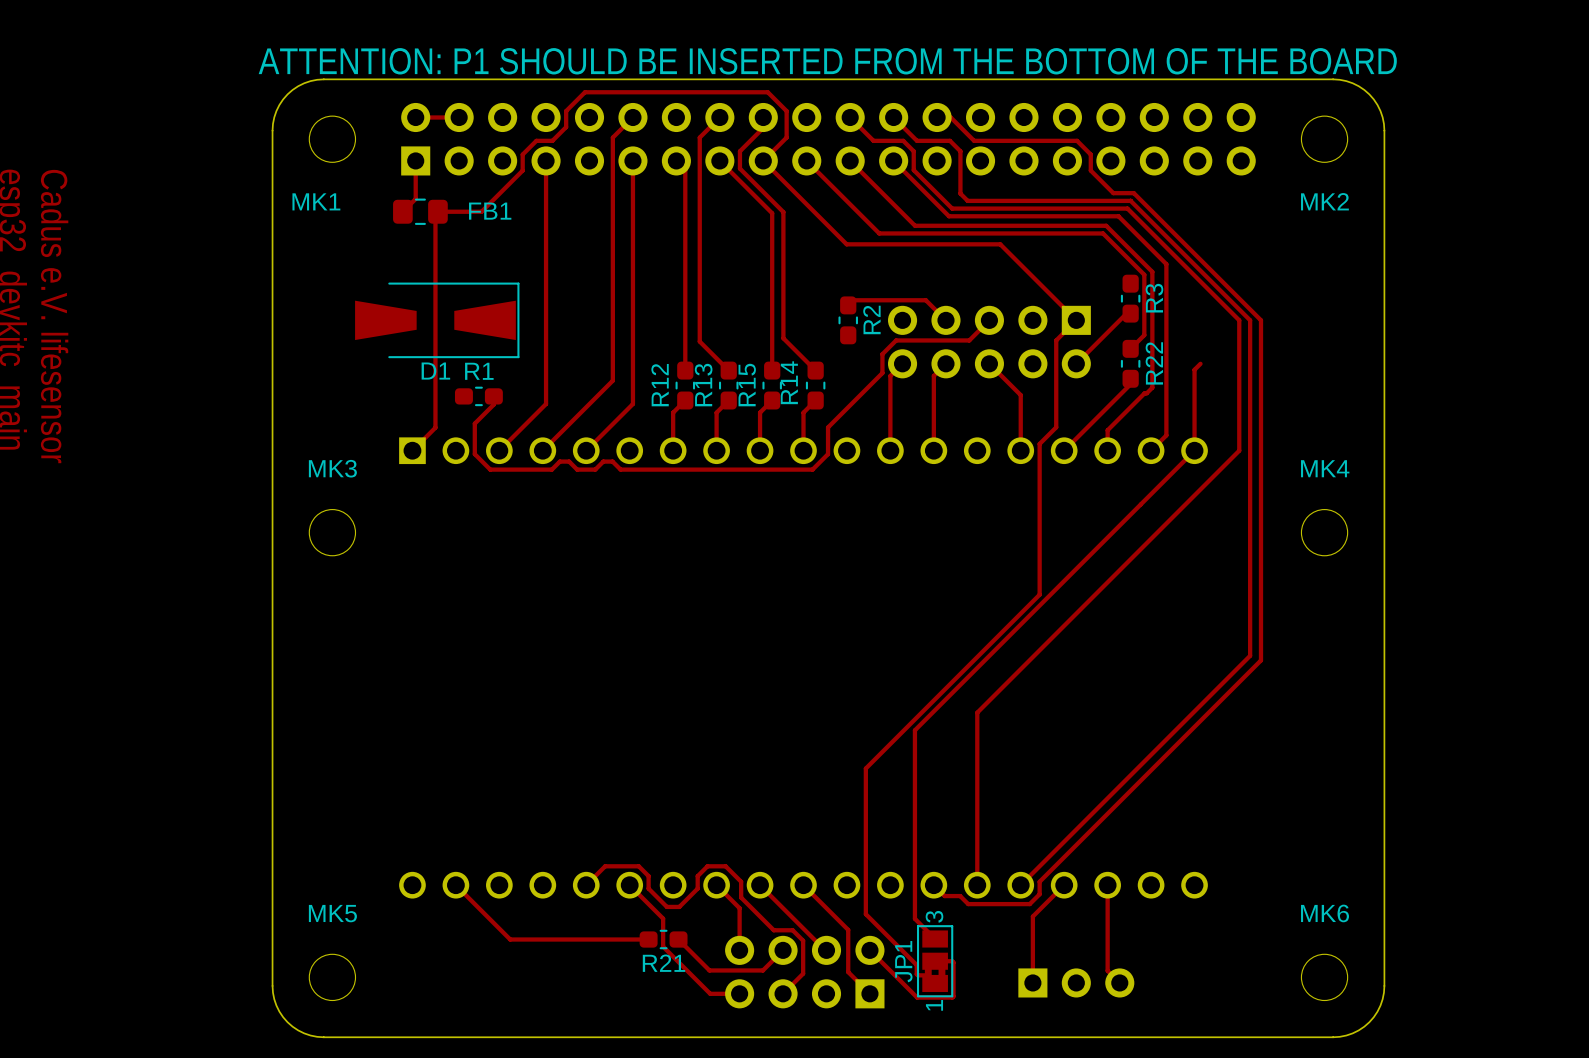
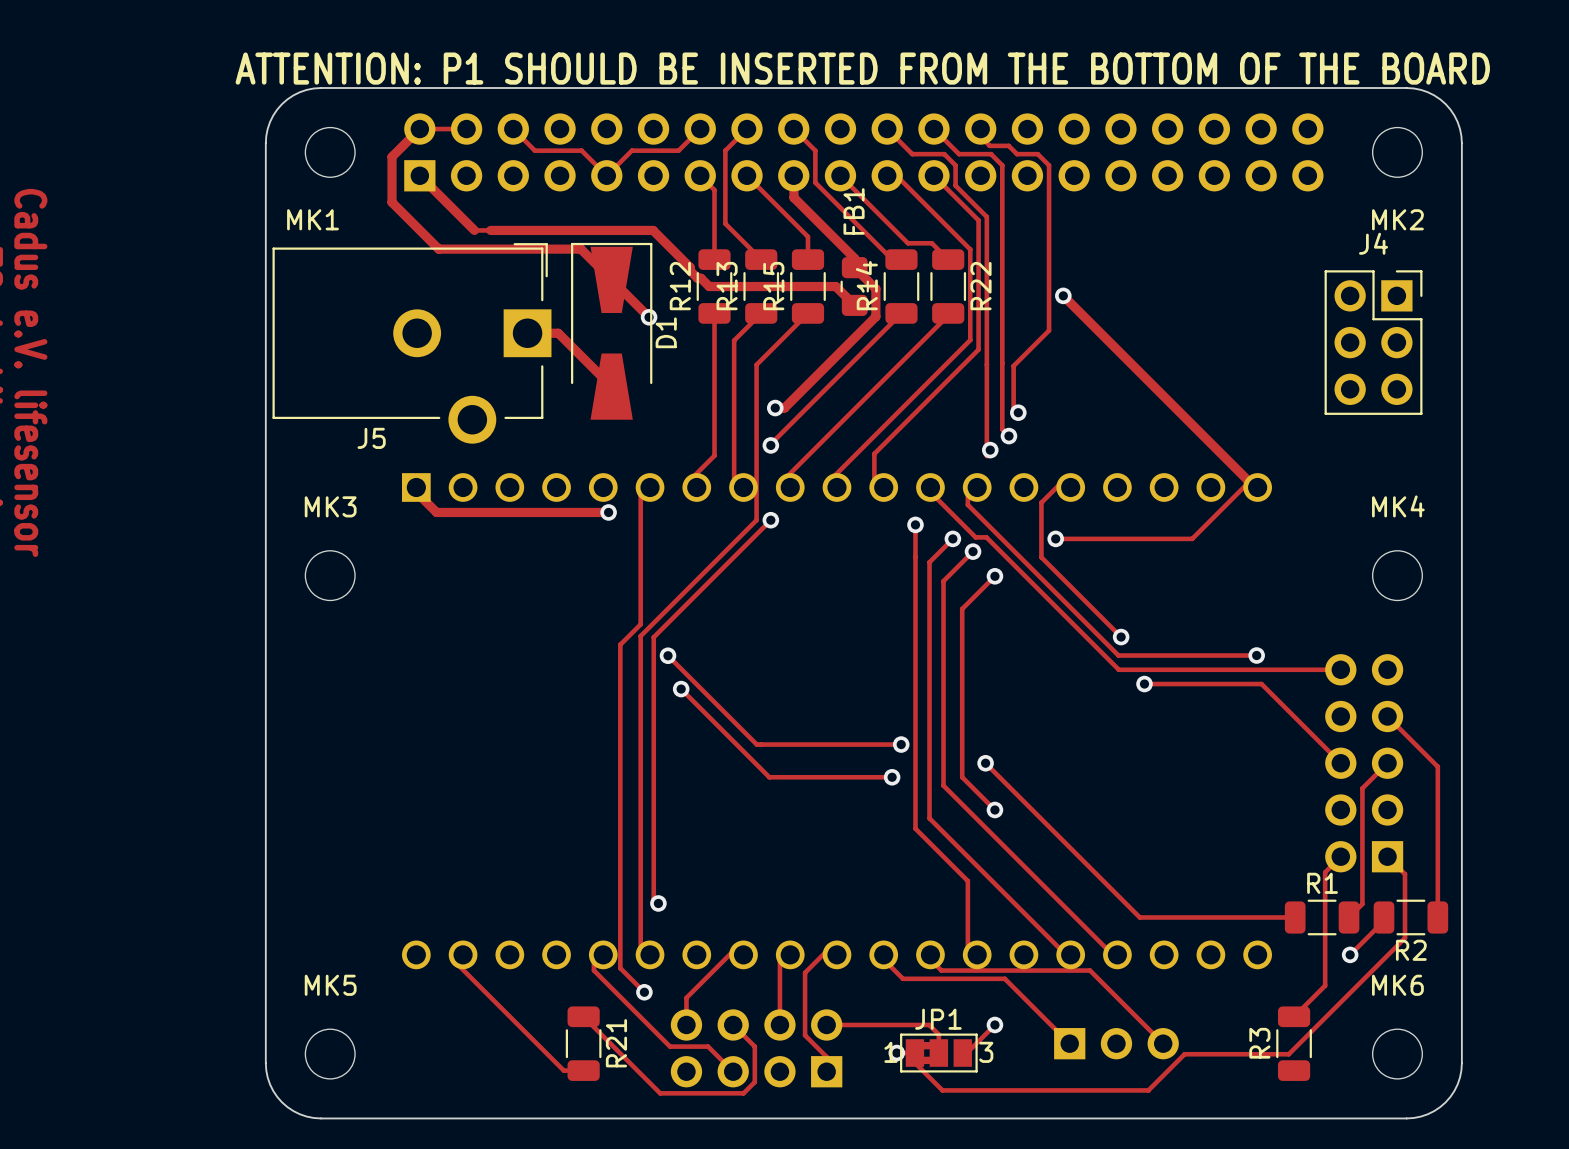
track: none -> (419, 129) (392, 156) (392, 202) (438, 249) (580, 249) (649, 317)
track: none -> (513, 129) (534, 150) (581, 150) (606, 175) (631, 150) (678, 150) (700, 129)
track: (632, 117) (612, 137) (612, 380) (542, 450) -> none
track: (763, 117) (763, 127) (739, 151) (739, 168) (783, 212) (783, 338) (815, 370) -> (793, 129) (815, 150) (815, 182) (892, 259) (901, 259)
track: (937, 117) (950, 117) (974, 140) -> (980, 129) (980, 136) (989, 145) (1008, 145) (1017, 154) (1020, 154)
track: (946, 140) (949, 140) (960, 151) (960, 193) (967, 200) (1130, 200) -> (991, 154) (1002, 165) (1002, 429) (1008, 436)
track: (990, 140) (1077, 140) (1090, 154) (1090, 170) (1113, 193) (1133, 193) (1260, 320) (1260, 660) (1039, 881) (1039, 894) (1029, 904) (968, 904) (960, 896) (944, 896) (933, 885) -> (1037, 154) (1049, 165) (1049, 330) (1013, 365) (1013, 408) (1018, 412)
track: (415, 160) (415, 198) (402, 211) -> (419, 175) (474, 230)
track: (546, 160) (546, 404) (499, 450) -> none
track: (632, 160) (632, 404) (586, 450) -> none
track: (850, 160) (915, 225) (1106, 225) (1152, 271) (1152, 387) (1107, 430) (1107, 450) -> (887, 175) (896, 175) (970, 249) (970, 340) (827, 482)
track: none -> (793, 176) (793, 197) (854, 258) (854, 267) (875, 288) (875, 316) (784, 408) (775, 408)
track: (685, 169) (685, 370) -> (709, 185) (714, 190) (714, 259)
track: (942, 199) (952, 208) (1127, 208) (1239, 320) (1239, 450) (977, 712) (977, 885) -> (986, 216) (986, 456) (990, 450)
track: (1130, 200) (1250, 320) (1250, 655) (1020, 885) -> none
track: (935, 202) (948, 216) (1118, 216) (1166, 264) (1166, 435) (1151, 450) -> (978, 220) (978, 349) (874, 453) (874, 482)
track: (699, 205) (699, 341) (728, 370) -> (725, 223) (761, 259)
FB1 rotation: 0° (420, 211) -> 90° clockwise (854, 286)
FB1 position: (420, 211) -> (854, 286)
track: (466, 211) (437, 211) (435, 214) (435, 427) (412, 450) -> none
track: (481, 211) (522, 170) (522, 154) (536, 140) (552, 140) (566, 127) (566, 111) (584, 92) (767, 92) (786, 111) (786, 137) (763, 160) (846, 244) (1000, 244) (1076, 320) (1056, 340) (1056, 427) (1039, 443) (1039, 594) (865, 768) (865, 914) (916, 965) (917, 975) (927, 975) (935, 983) -> (490, 230) (653, 230) (690, 267) (690, 270) (709, 286) (835, 286) (854, 305)
FB1 name position: FB1 (490, 211) -> FB1 (854, 211)
track: (772, 213) (772, 370) -> (803, 232) (807, 236) (807, 259)
track: (869, 223) (879, 233) (1103, 233) (1144, 274) (1144, 335) (1130, 348) -> (907, 243) (931, 243) (948, 259)
track: none -> (1063, 295) (1248, 482) (1192, 538) (1055, 538)
via: none -> (1063, 295)
R3 footprint: [1120, 274, 1141, 323] -> [1276, 1006, 1312, 1081]
track: none -> (714, 313) (714, 455) (687, 482)
track: none -> (761, 313) (734, 340) (734, 482)
track: none -> (807, 313) (756, 364) (756, 520) (640, 636) (640, 950)
track: none -> (901, 313) (770, 445)
track: none -> (948, 313) (780, 482)
via: none -> (649, 317)
R2 footprint: [838, 296, 858, 345] -> [1373, 899, 1449, 936]
R3 name position: R3 (1154, 298) -> R3 (1259, 1043)
track: (848, 305) (853, 300) (925, 300) (945, 320) -> none
track: none -> (527, 333) (558, 333) (611, 386)
track: (1130, 313) (1126, 313) (1076, 363) -> none
J5: none -> (412, 343)
J4: none -> (1373, 342)
R2 name position: R2 (871, 319) -> R2 (1411, 950)
D1 rotation: 0° (437, 320) -> 90° counterclockwise (611, 331)
D1 position: (437, 320) -> (611, 331)
track: (989, 320) (969, 340) (896, 340) (882, 354) (882, 373) (828, 427) (828, 454) (812, 469) (620, 469) (612, 461) (603, 461) (595, 469) (577, 469) (569, 461) (559, 461) (551, 469) (490, 469) (474, 454) (474, 423) (493, 404) (493, 396) -> none
R22 footprint: [1120, 339, 1141, 388] -> [930, 249, 967, 324]
part: (989, 342) -> none
R12 footprint: [675, 361, 696, 410] -> [696, 249, 733, 324]
R13 footprint: [718, 361, 739, 410] -> [743, 249, 780, 324]
R15 footprint: [762, 361, 782, 410] -> [790, 249, 826, 324]
R14 footprint: [805, 361, 826, 410] -> [883, 249, 920, 324]
track: (902, 363) (890, 375) (890, 450) -> none
track: (945, 363) (933, 375) (933, 450) -> none
track: (989, 363) (1020, 395) (1020, 450) -> none
track: (1200, 363) (1194, 369) (1194, 450) (914, 730) (914, 918) (935, 939) -> none
via: none -> (775, 408)
track: (1130, 378) (1130, 384) (1064, 450) -> none
via: none -> (1018, 412)
R1 footprint: [454, 386, 503, 407] -> [1284, 899, 1360, 936]
track: (685, 400) (673, 412) (673, 450) -> none
track: (728, 400) (716, 412) (716, 450) -> none
track: (772, 400) (760, 412) (760, 450) -> none
track: (815, 400) (803, 412) (803, 450) -> none
via: none -> (1008, 436)
via: none -> (770, 445)
via: none -> (990, 450)
track: none -> (406, 482) (436, 512) (608, 512)
track: none -> (640, 482) (640, 624) (620, 644) (620, 968) (644, 992)
track: none -> (921, 482) (975, 537) (986, 537) (1118, 669) (1340, 669)
track: none -> (967, 482) (967, 504) (1118, 655) (1256, 655)
track: none -> (1061, 482) (1041, 502) (1041, 557) (1121, 637)
via: none -> (608, 512)
track: none -> (770, 520) (653, 637) (653, 898) (658, 903)
via: none -> (770, 520)
track: none -> (915, 524) (915, 828) (967, 881) (967, 950)
via: none -> (915, 524)
track: none -> (952, 538) (929, 562) (929, 818) (1061, 950)
via: none -> (952, 538)
via: none -> (1055, 538)
track: none -> (973, 551) (943, 581) (943, 785) (1108, 950)
via: none -> (973, 551)
track: none -> (994, 576) (962, 609) (962, 777) (994, 809)
via: none -> (994, 576)
via: none -> (1121, 637)
via: none -> (1256, 655)
track: none -> (668, 655) (756, 744) (901, 744)
via: none -> (668, 655)
track: none -> (1144, 684) (1261, 684) (1340, 763)
via: none -> (1144, 684)
track: none -> (681, 689) (769, 777) (892, 777)
via: none -> (681, 689)
track: none -> (1387, 716) (1437, 766) (1437, 917)
via: none -> (901, 744)
track: none -> (985, 763) (1139, 917) (1295, 917)
via: none -> (985, 763)
part: none -> (1364, 763)
track: none -> (1387, 763) (1362, 788) (1362, 904) (1349, 917)
via: none -> (892, 777)
via: none -> (994, 809)
track: none -> (1340, 856) (1325, 872) (1325, 985) (1294, 1016)
track: none -> (1387, 856) (1405, 874) (1405, 938) (1288, 1054) (1184, 1054) (1148, 1090) (942, 1090) (914, 1062) (914, 1053) (896, 1053)
via: none -> (658, 903)
track: none -> (1384, 917) (1384, 921) (1350, 954)
track: none -> (453, 950) (453, 960) (563, 1070) (583, 1070)
track: none -> (593, 950) (593, 970) (670, 1046) (708, 1046) (733, 1071)
track: none -> (734, 950) (686, 997) (686, 1024)
track: none -> (780, 950) (779, 1024)
track: none -> (827, 950) (805, 972) (805, 1035) (826, 1056) (826, 1071)
track: none -> (874, 950) (902, 978) (1004, 978) (1069, 1043)
track: none -> (921, 950) (941, 970) (1090, 970) (1163, 1043)
track: (455, 885) (510, 939) (648, 939) -> none
track: (586, 885) (605, 866) (638, 866) (648, 876) (648, 888) (666, 906) (679, 906) (697, 888) (697, 876) (707, 866) (725, 866) (741, 881) (741, 897) (773, 930) (792, 930) (803, 940) (803, 973) (783, 993) -> none
track: (629, 885) (663, 918) (663, 946) (710, 993) (739, 993) -> none
track: (716, 885) (739, 908) (739, 950) -> none
track: (760, 885) (825, 950) -> (826, 1024) (860, 1024)
track: (803, 885) (848, 929) (848, 972) (869, 993) -> none
track: (1064, 885) (1032, 916) (1032, 982) -> none
track: (1107, 885) (1107, 970) (1119, 982) -> none
via: none -> (1350, 954)
via: none -> (644, 992)
R21 footprint: [639, 929, 688, 950] -> [565, 1006, 602, 1081]
track: (678, 939) (709, 970) (762, 970) (783, 950) -> none
track: none -> (583, 1016) (660, 1093) (743, 1093) (754, 1082) (754, 1046) (733, 1024)
track: none -> (861, 1024) (929, 1024) (938, 1034) (938, 1053)
track: (869, 950) (917, 997) (952, 997) (953, 962) (935, 961) -> none
track: none -> (994, 1024) (966, 1053) (962, 1053)
via: none -> (994, 1024)
JP1 rotation: 0° (935, 961) -> 90° clockwise (938, 1053)
R21 name position: R21 (663, 963) -> R21 (616, 1043)
part position: (804, 972) -> (756, 1048)
via: none -> (896, 1053)
part position: (1076, 982) -> (1116, 1043)

